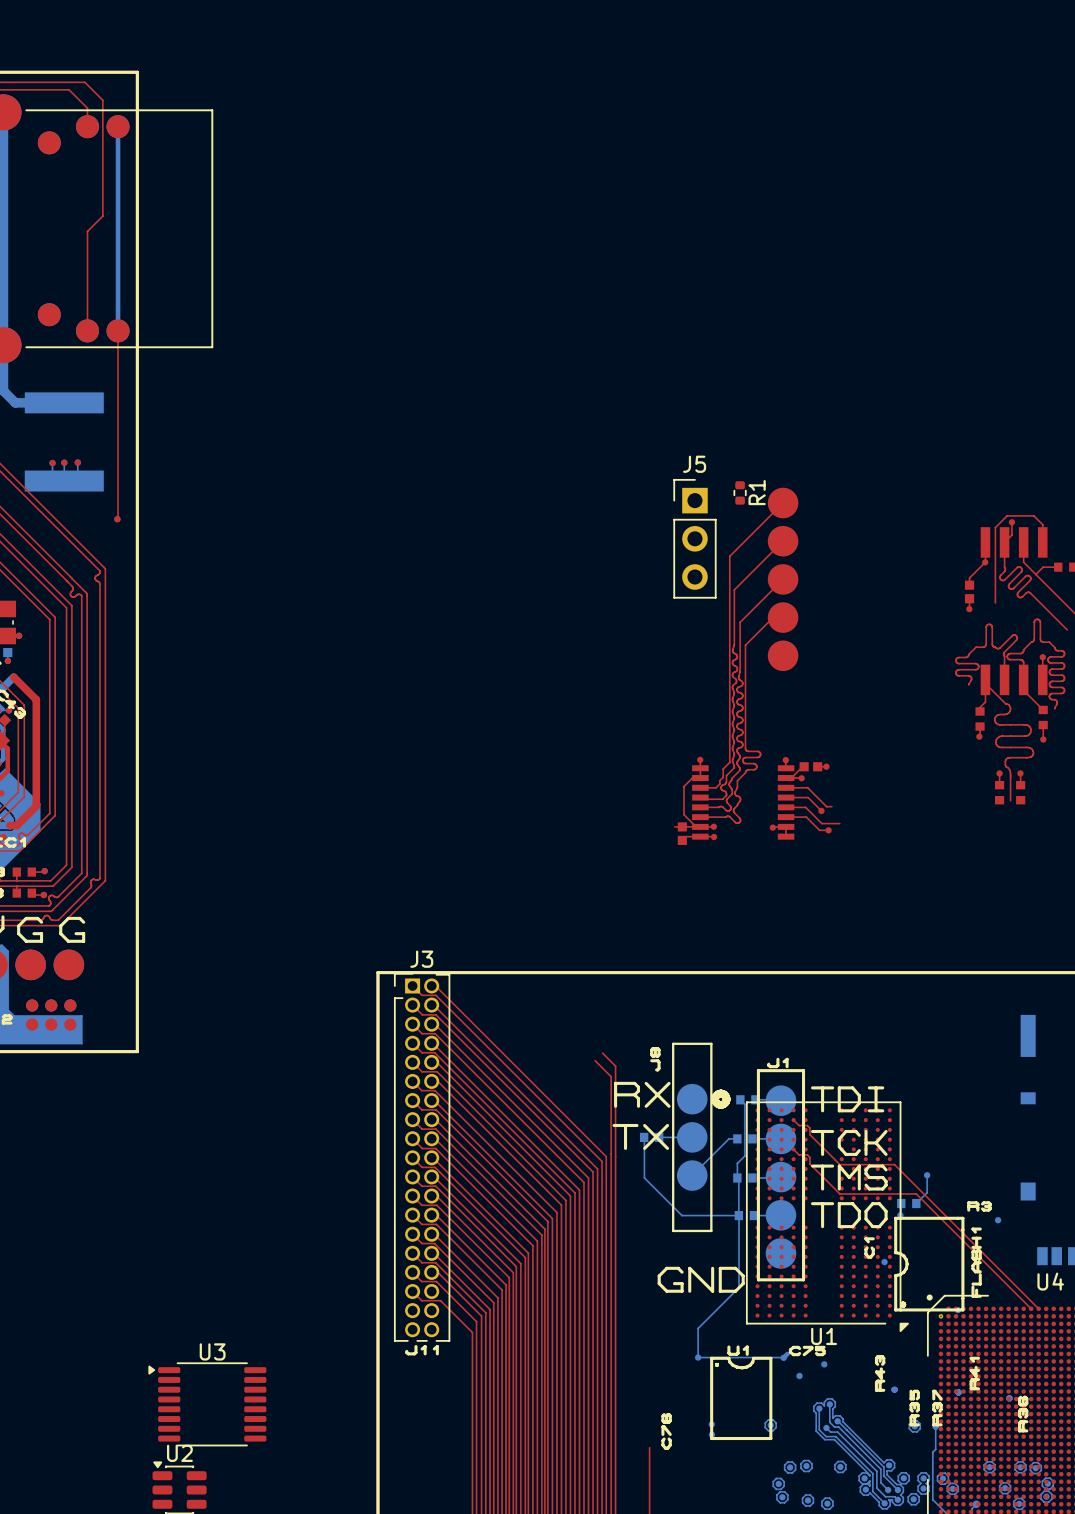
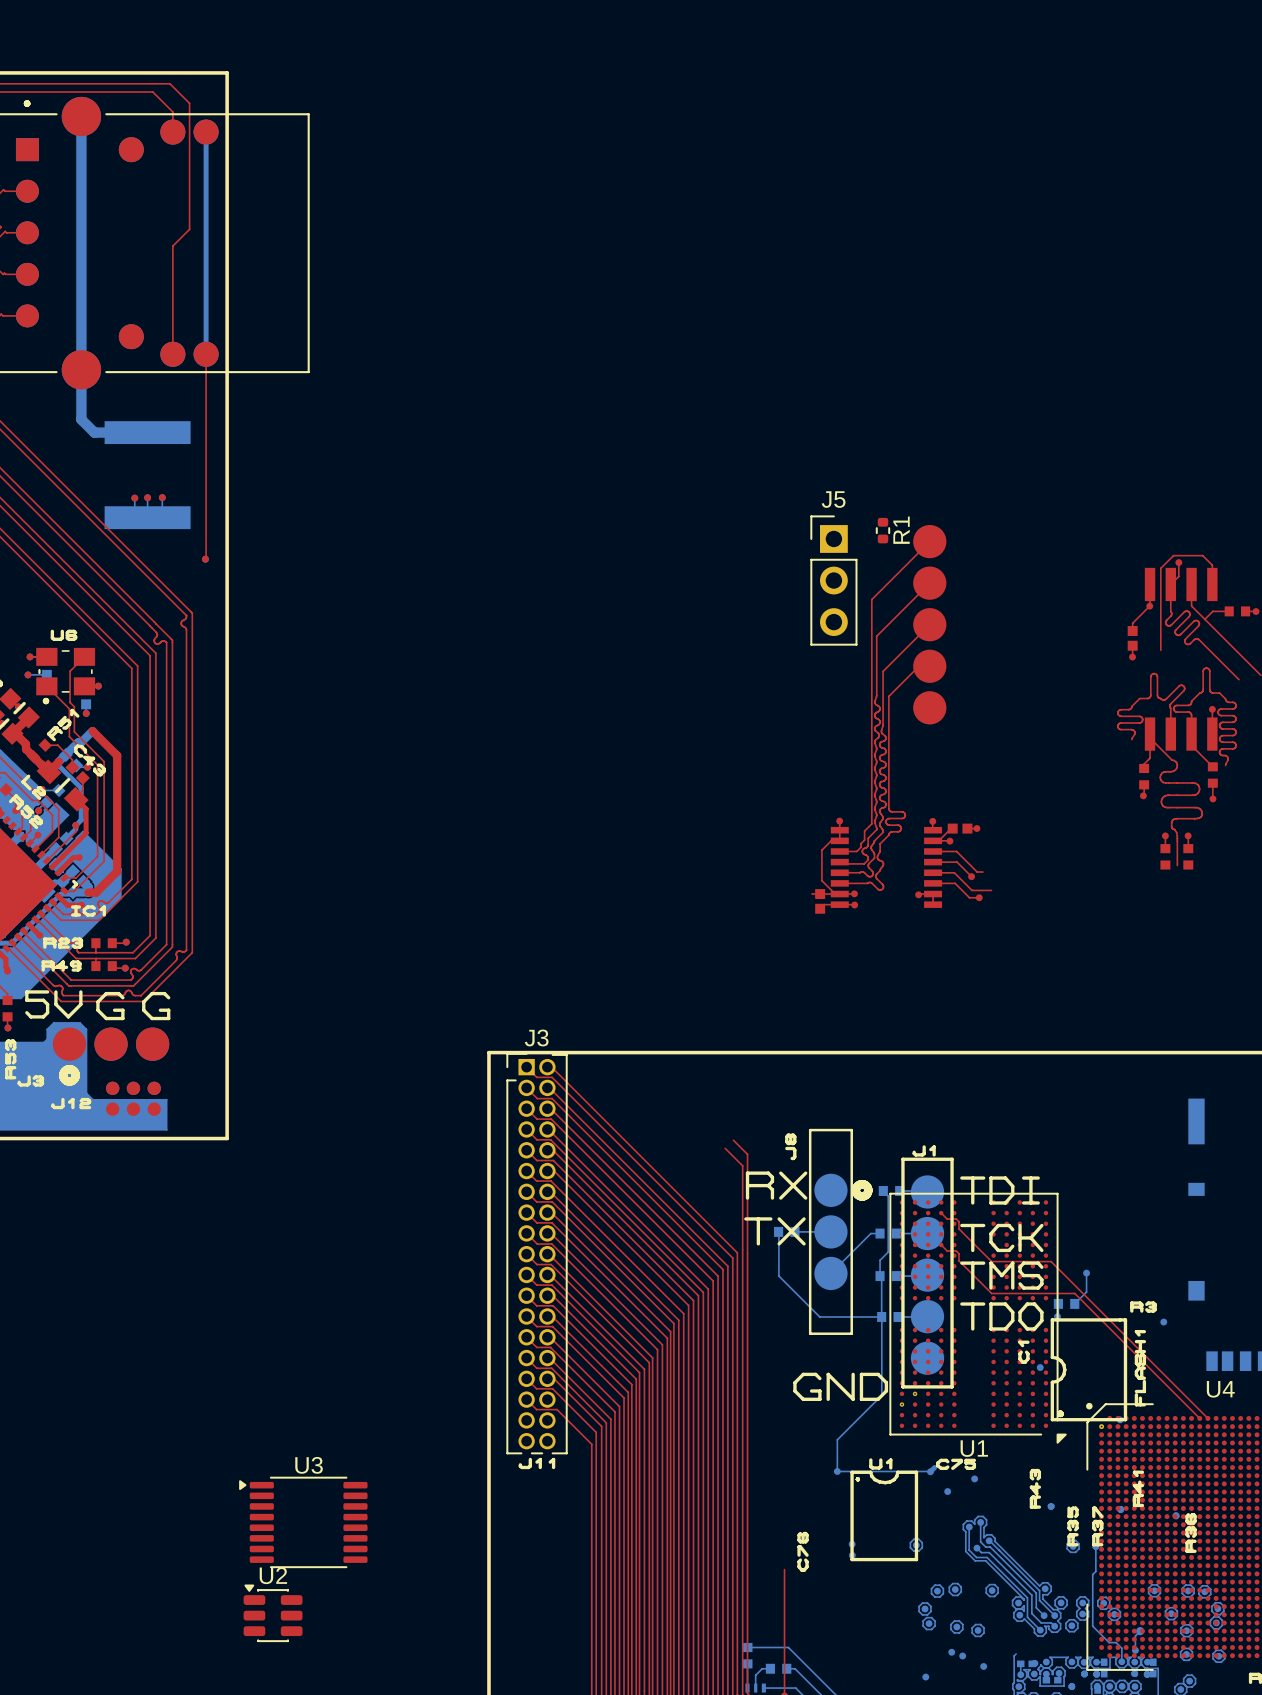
U1 footprint: [745, 1101, 909, 1333] -> [889, 1192, 1067, 1444]

